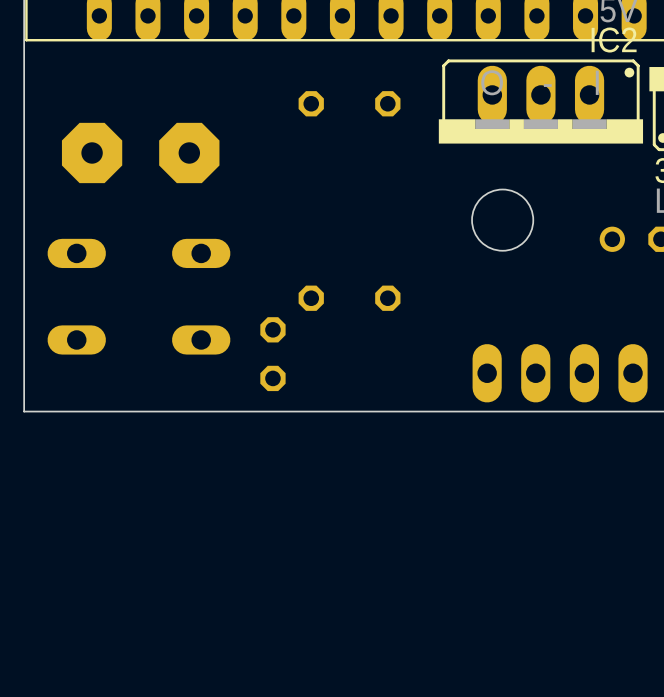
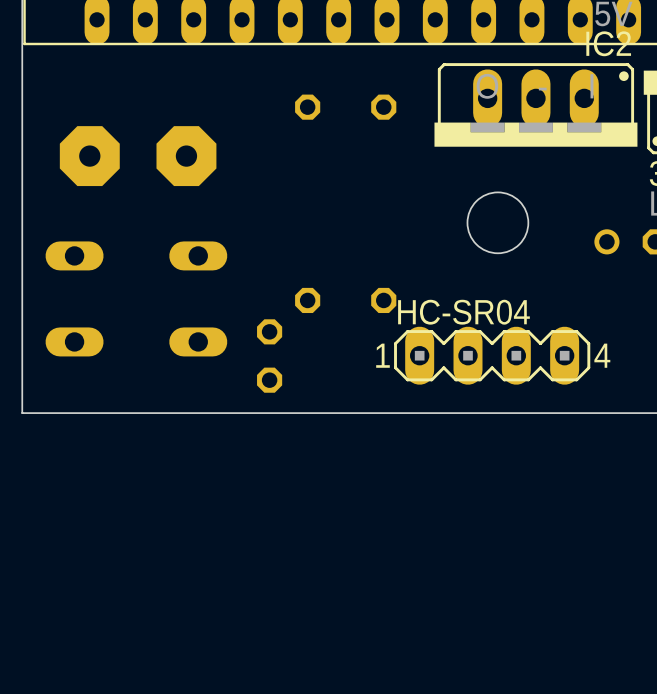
HC-SR04 side: top (560, 373) -> bottom (492, 355)

